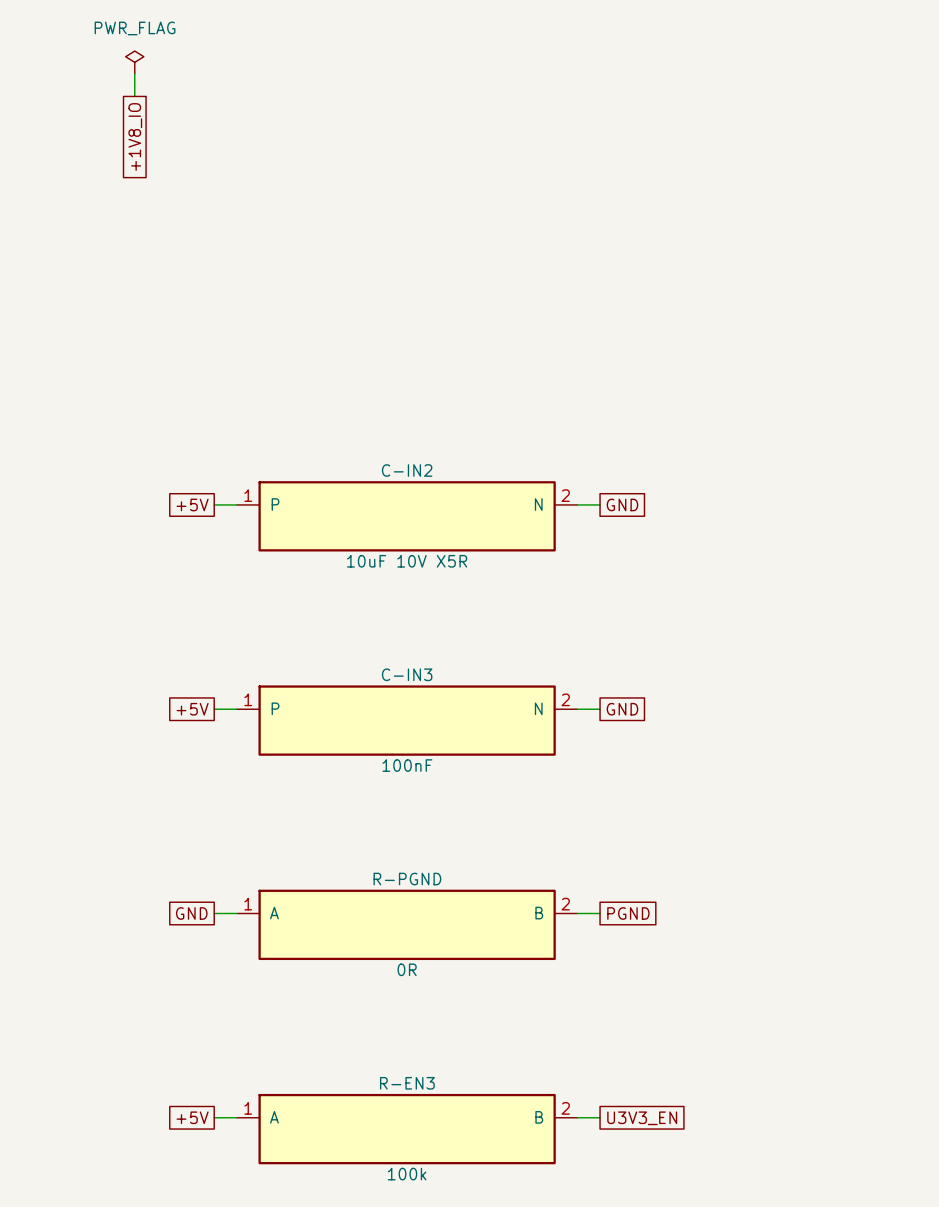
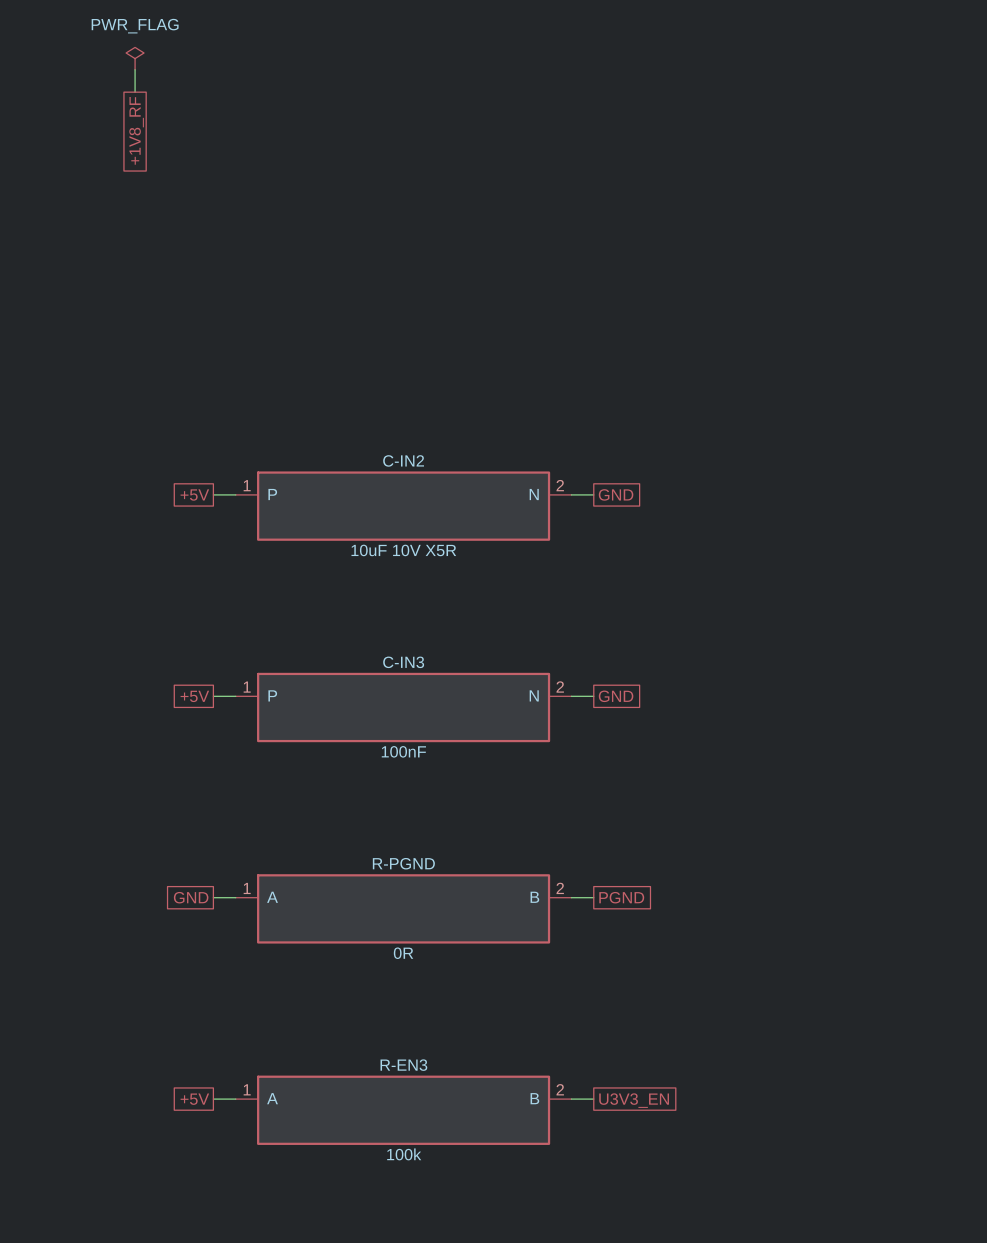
global label: +1V8_IO (135, 136) -> +1V8_RF (136, 130)

